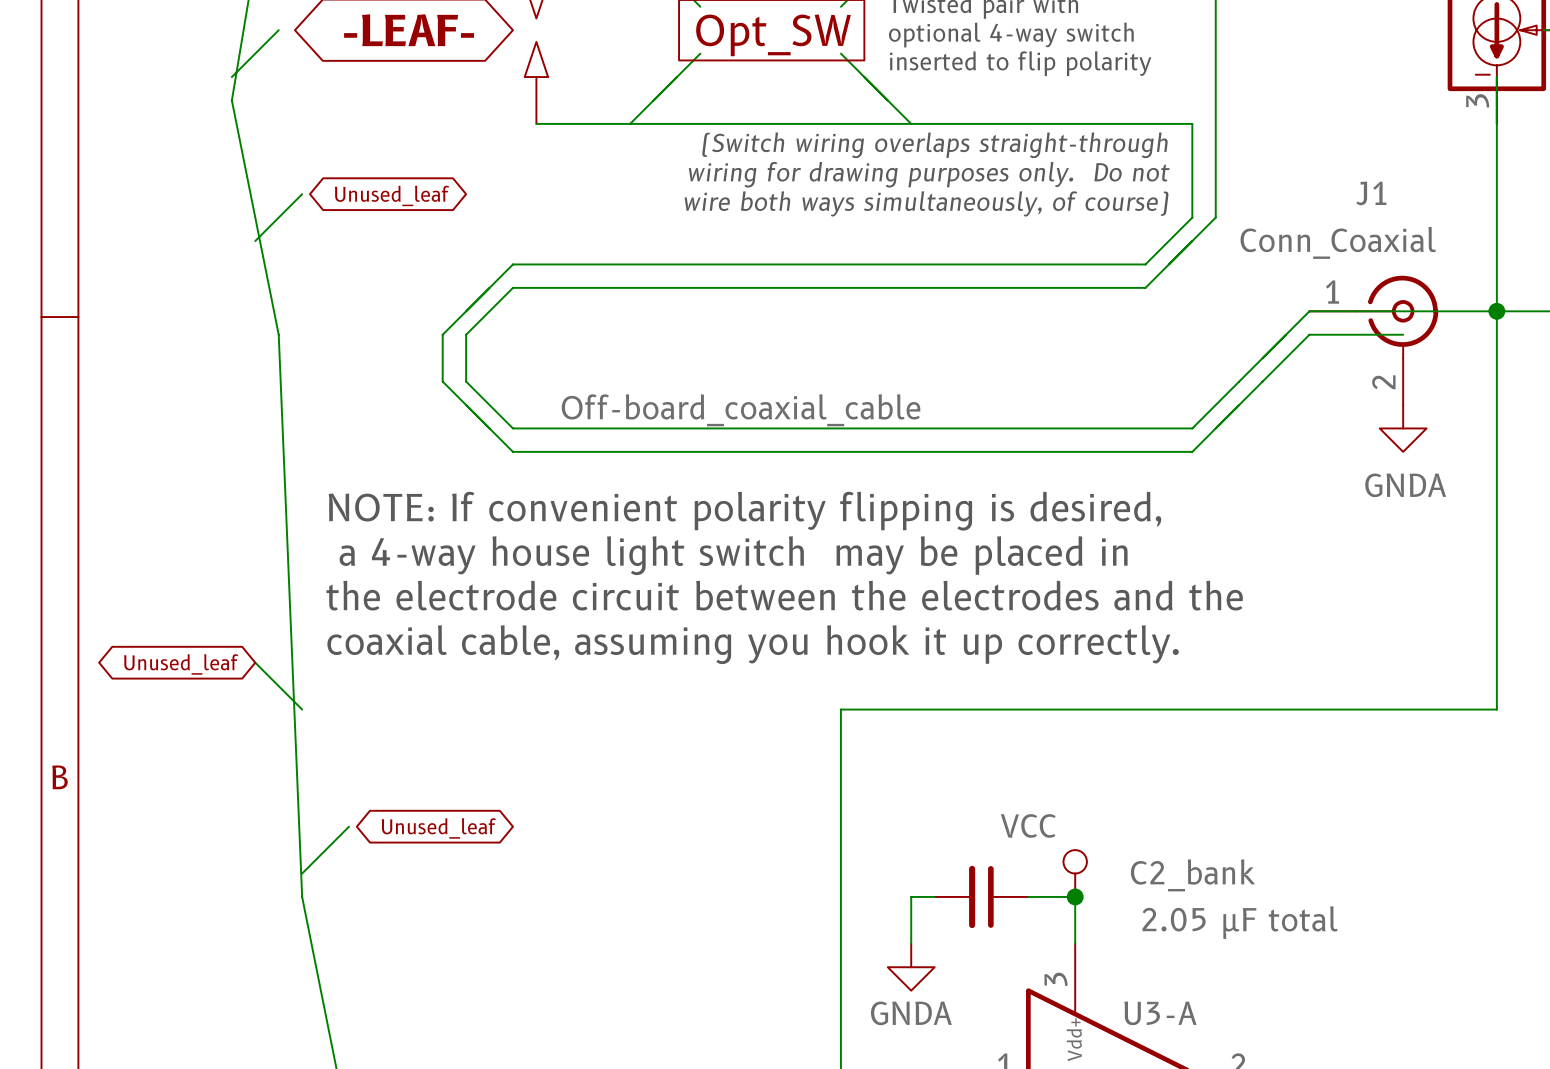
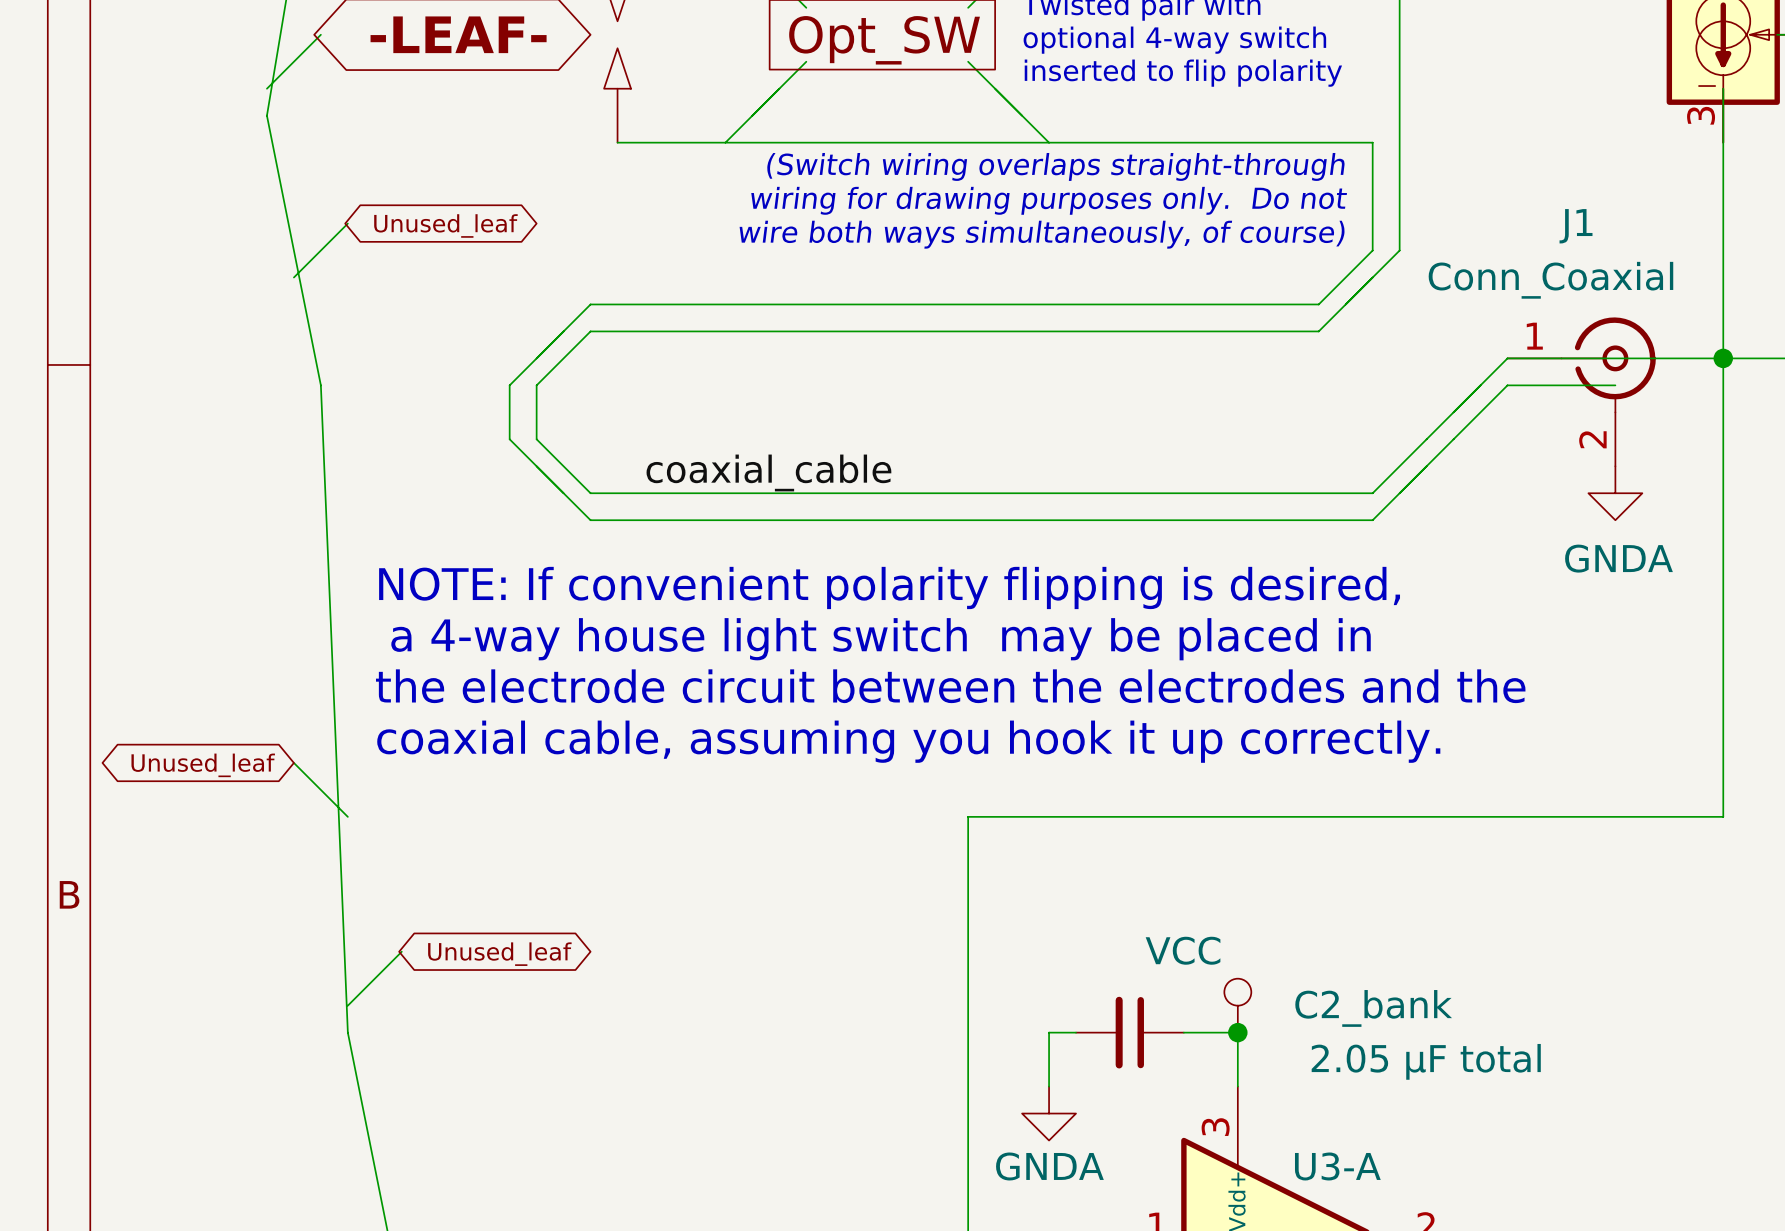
label: Off-board_coaxial_cable (741, 410) -> coaxial_cable (768, 472)

